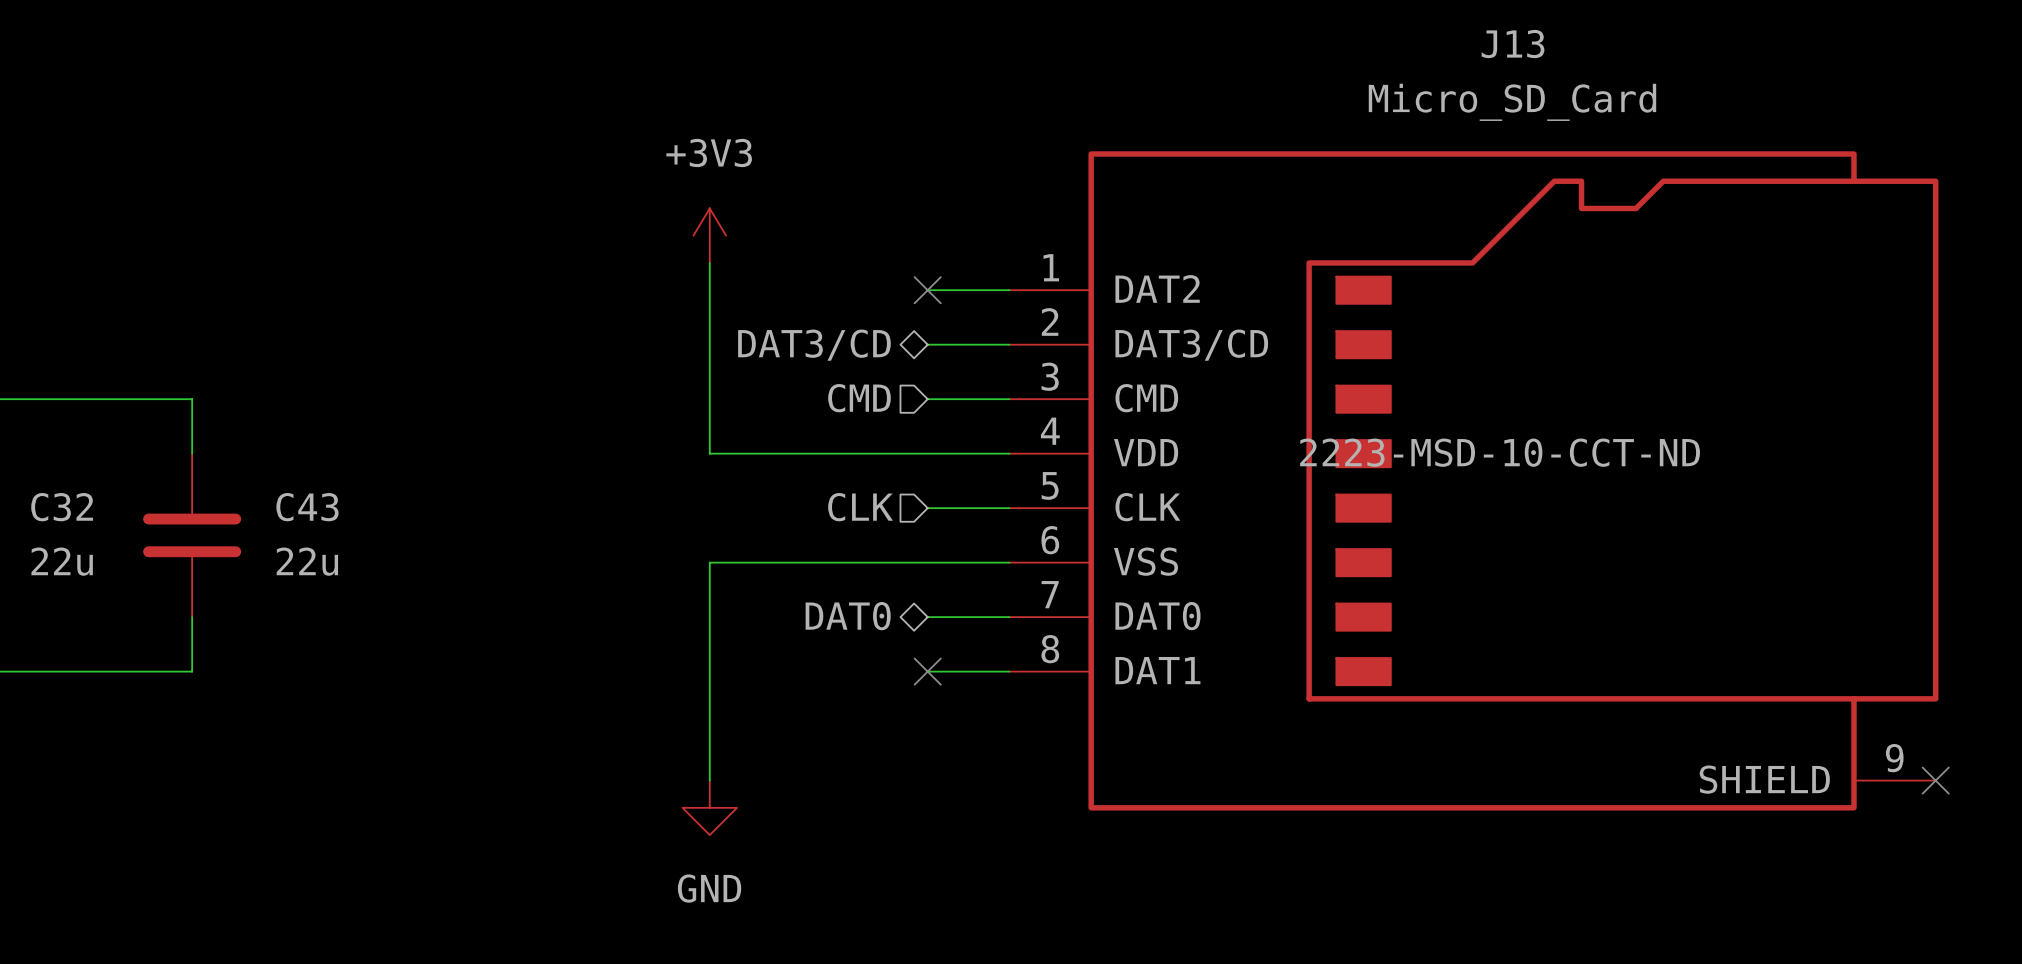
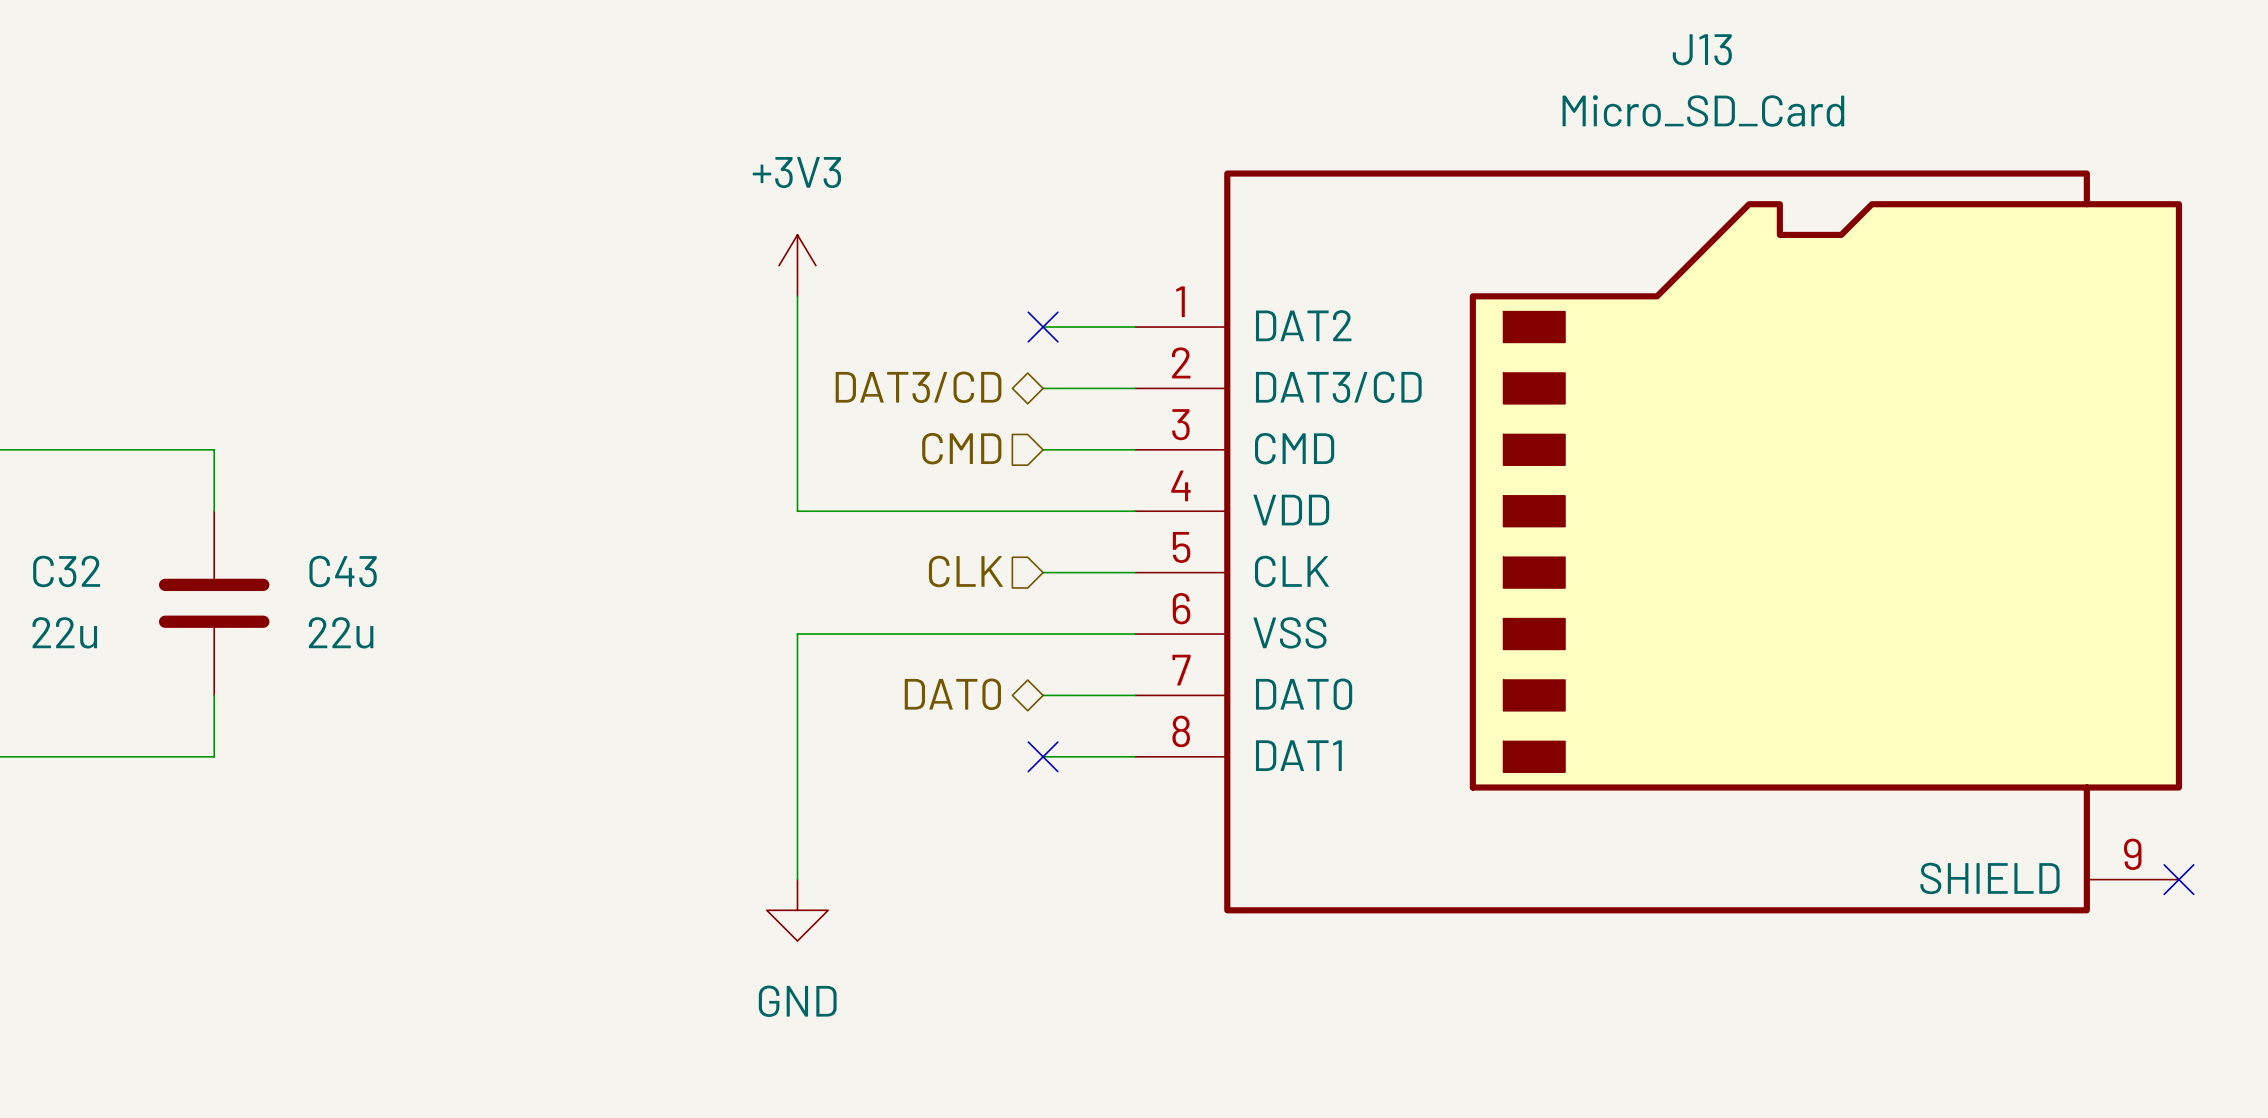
J13 text: 2223-MSD-10-CCT-ND (1500, 452) -> none

